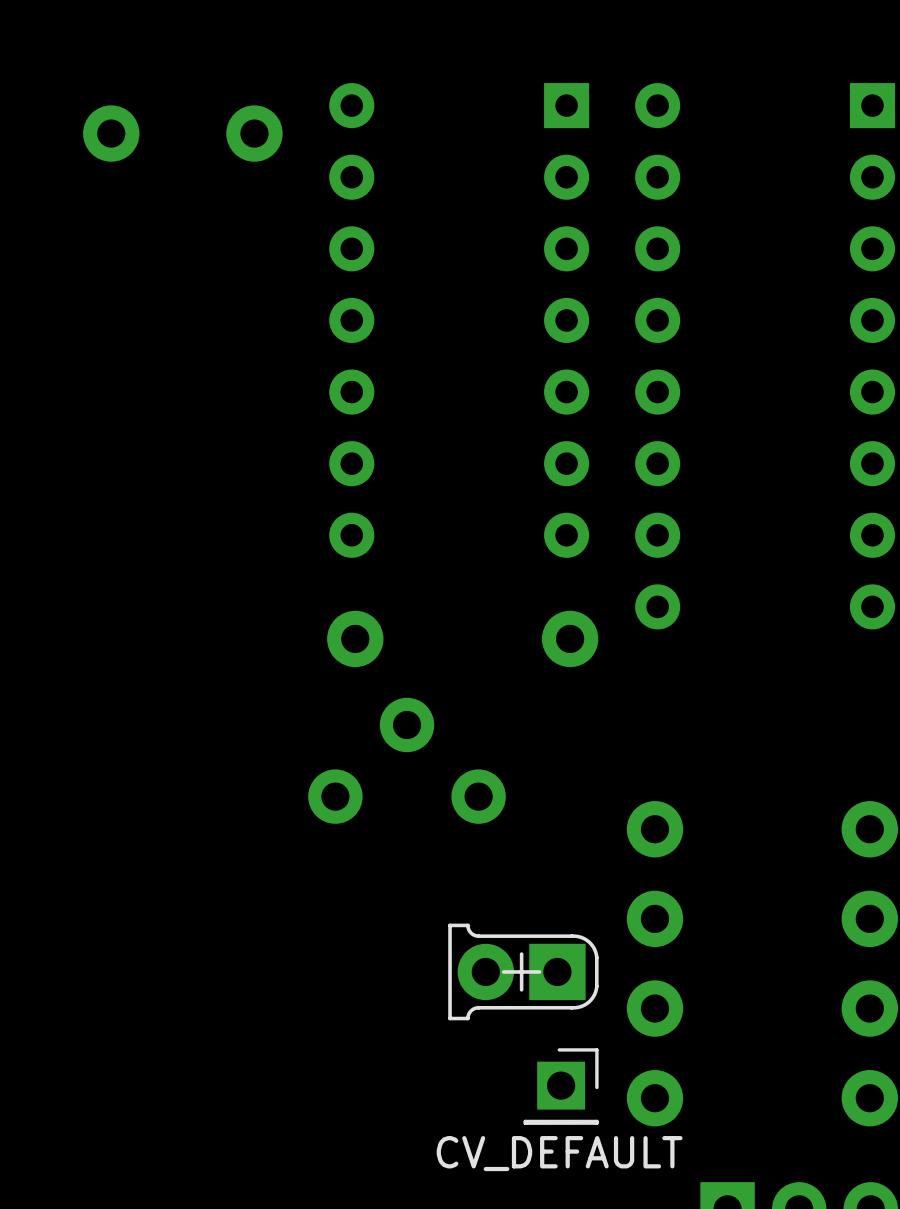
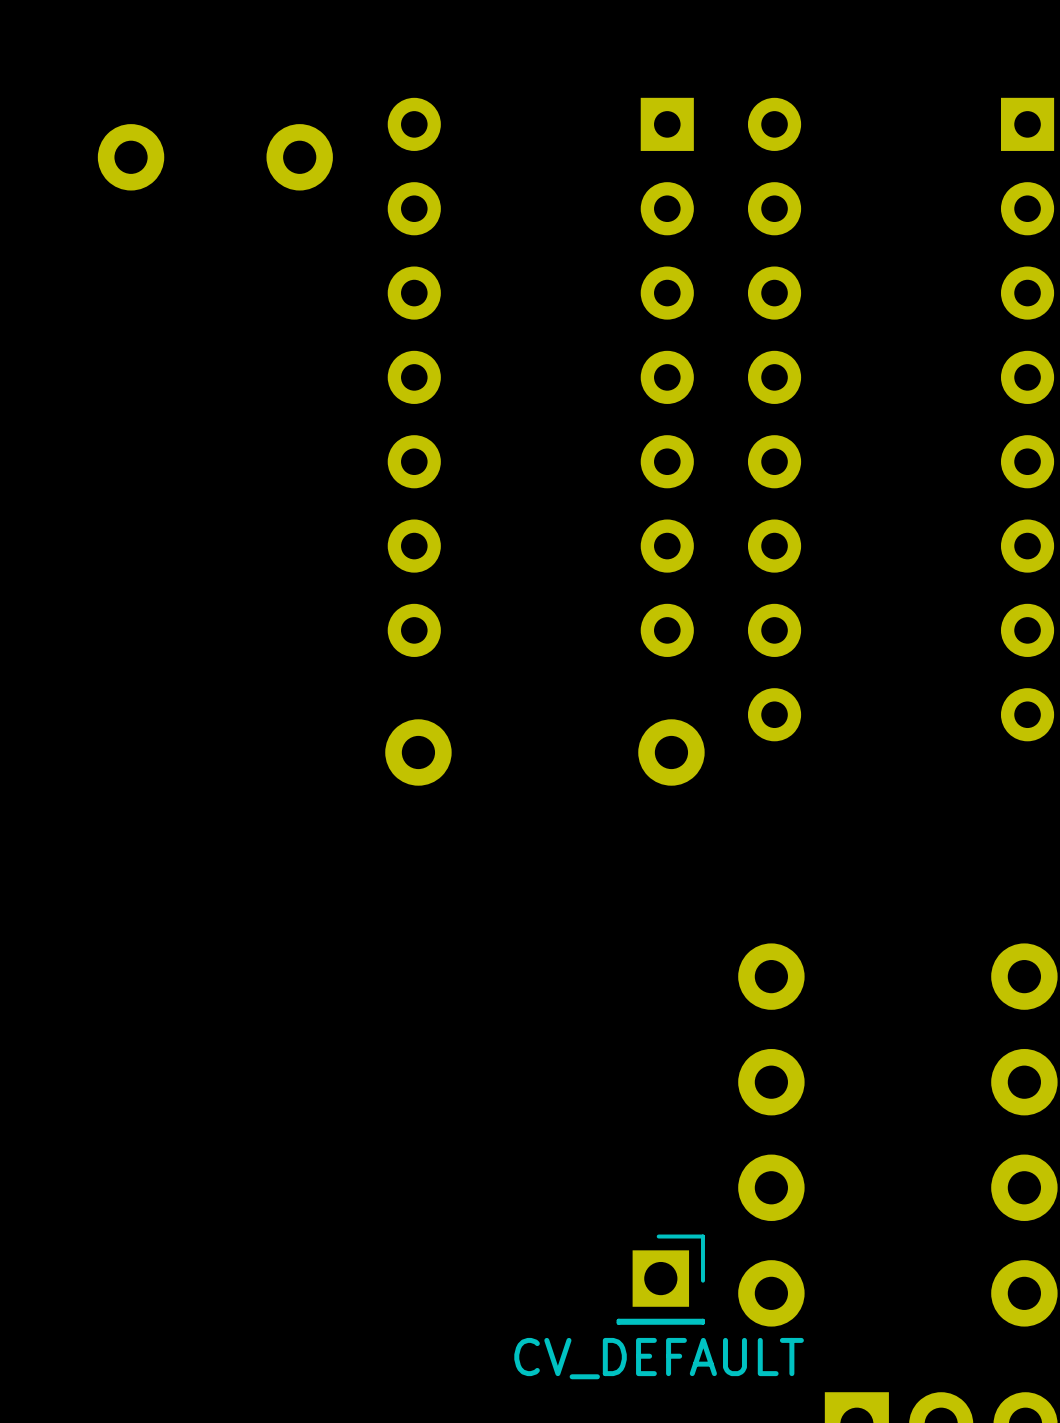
part: (407, 760) -> none
part: (523, 971) -> none

